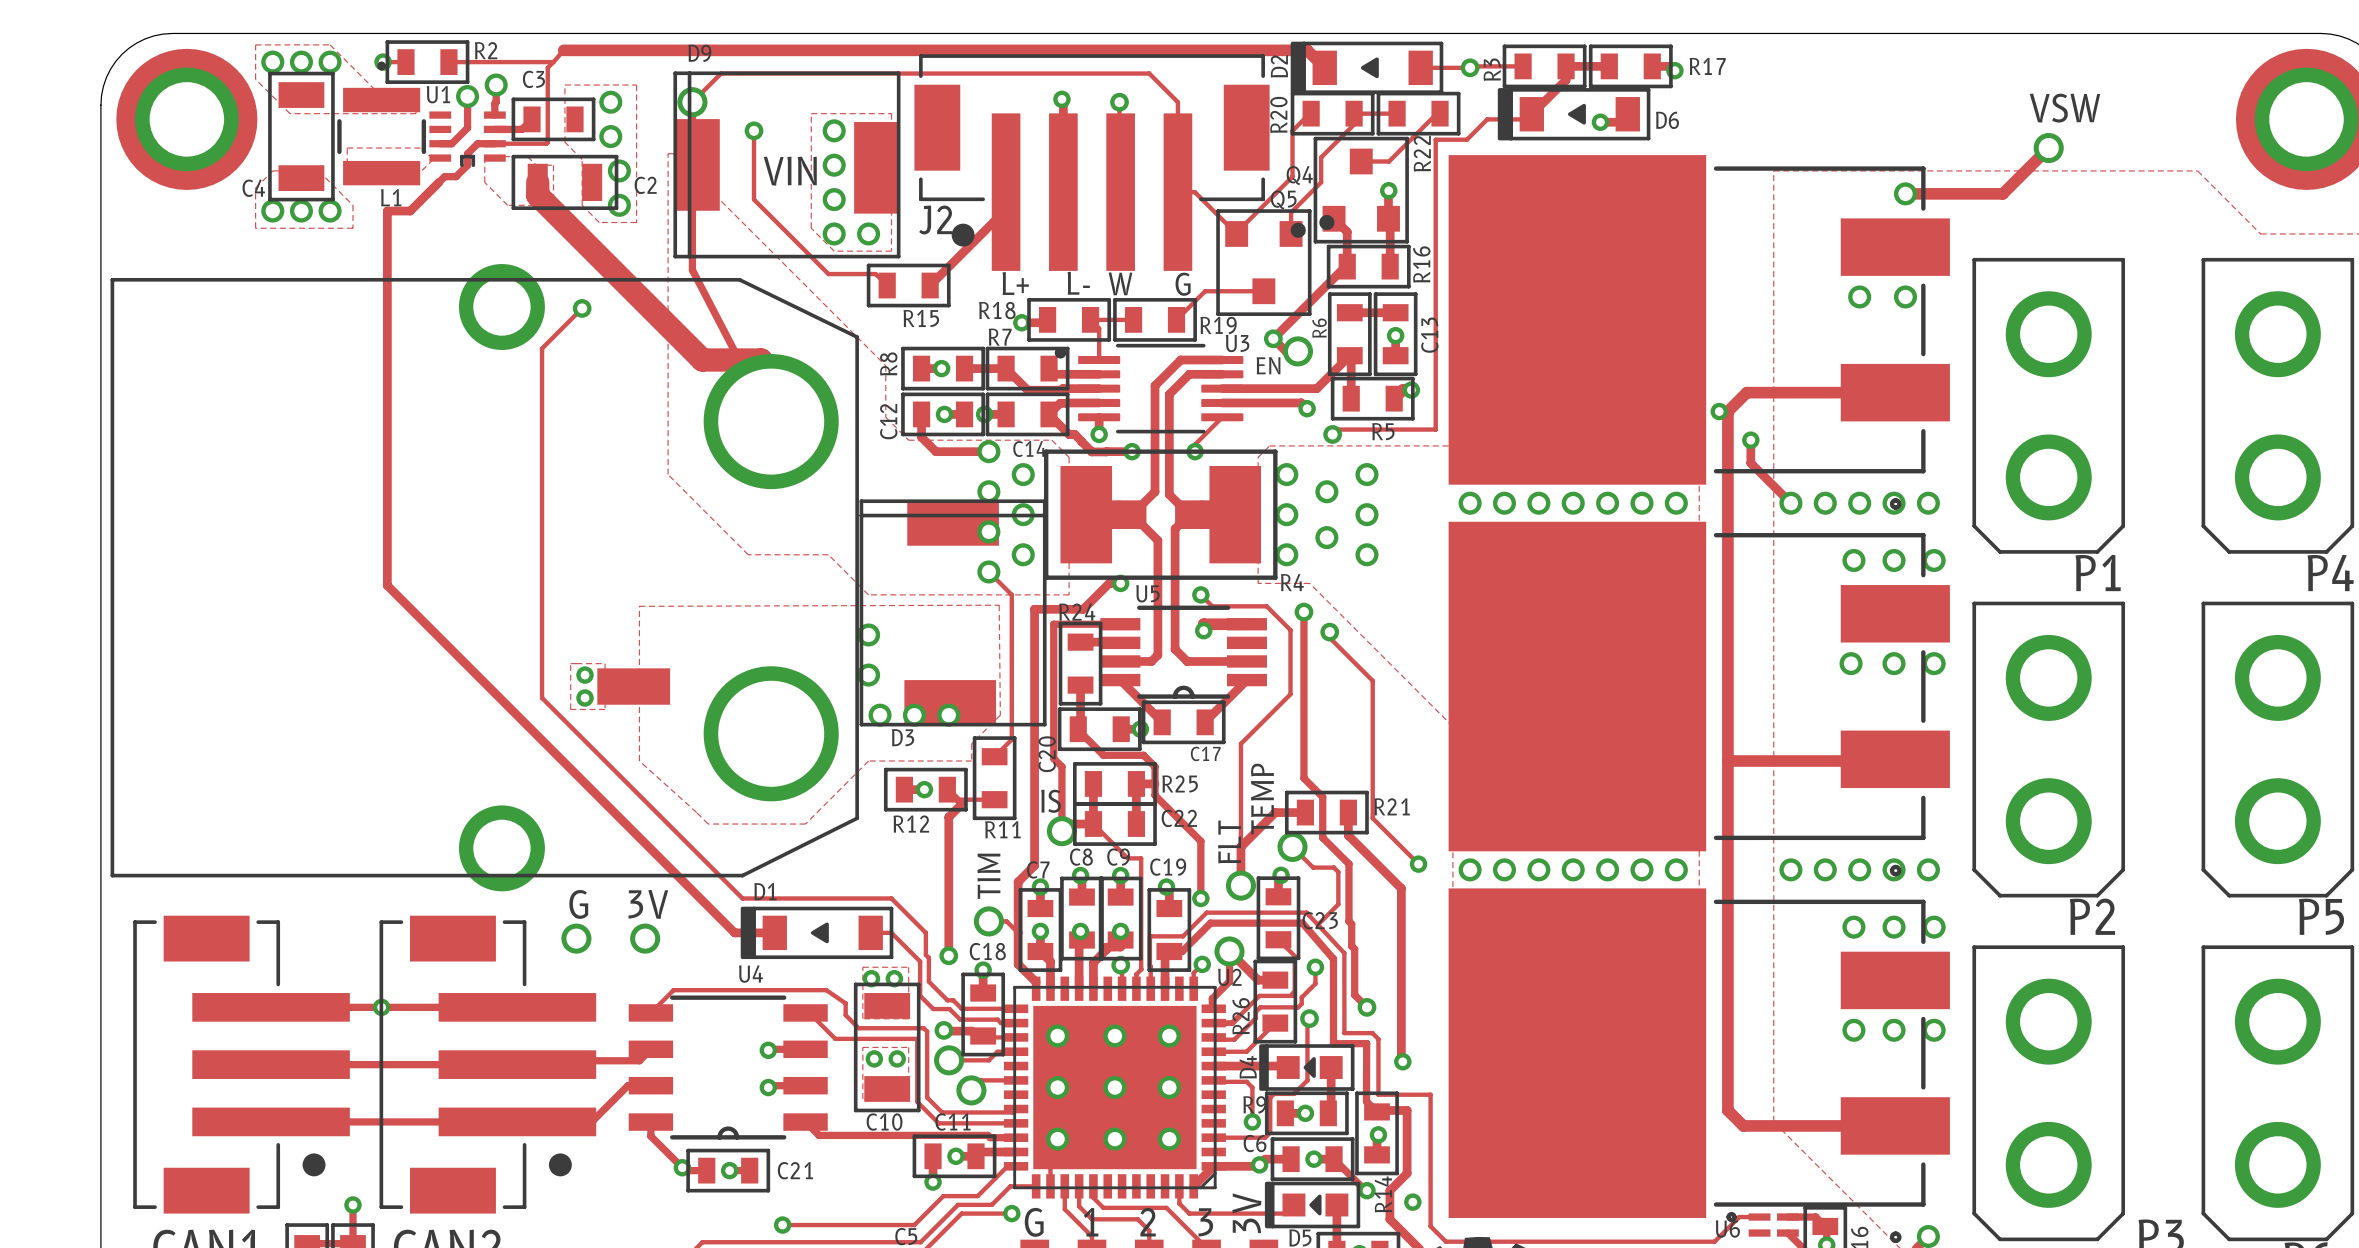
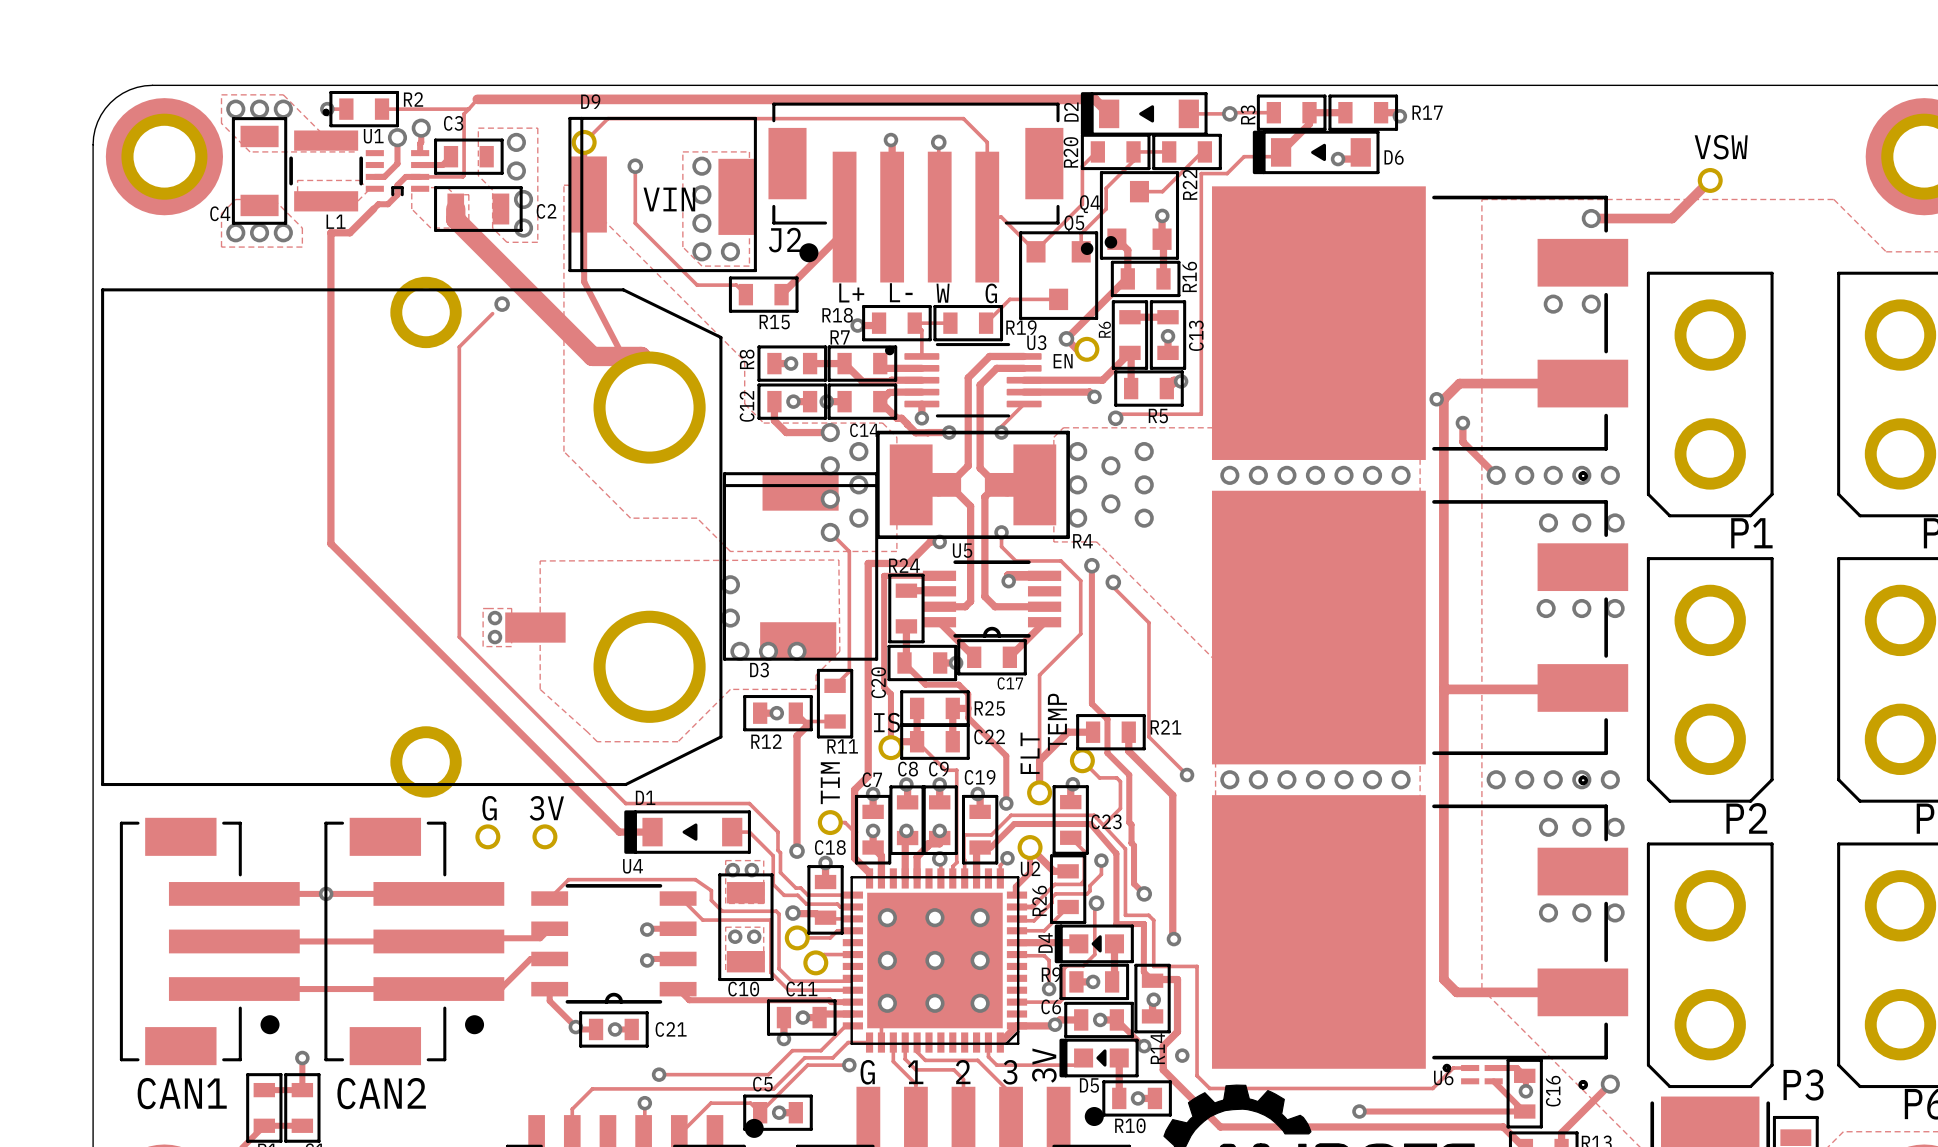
via position: (582, 308) -> (502, 304)
track: none -> (1001, 532) (1001, 546) (1006, 551)
via position: (1200, 594) -> (1001, 532)

